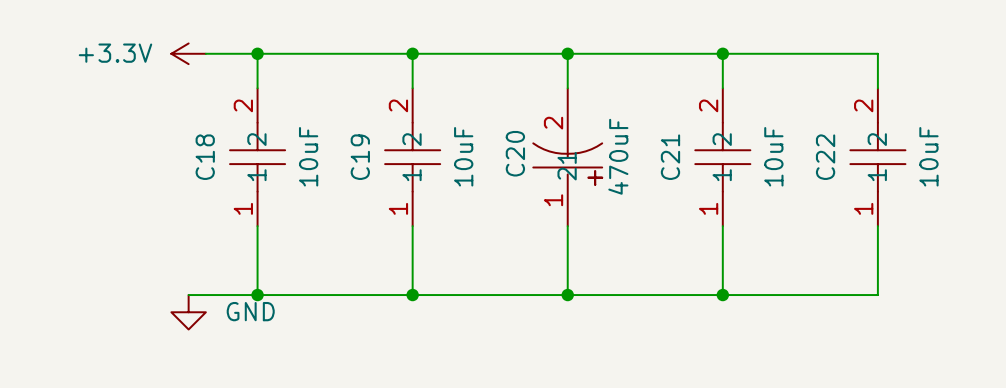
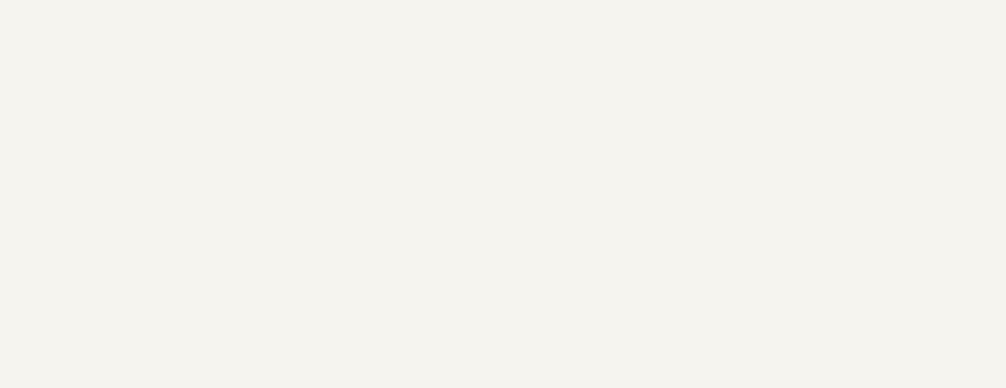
power symbol: +3.3V (188, 53) -> none
wire: (205, 53) (877, 53) (877, 88) -> none
wire: (257, 53) (257, 88) -> none
junction: (257, 53) -> none
wire: (412, 53) (412, 88) -> none
junction: (412, 53) -> none
wire: (567, 53) (567, 88) -> none
junction: (567, 53) -> none
wire: (722, 53) (722, 88) -> none
junction: (722, 53) -> none
C18: 10uF (257, 157) -> none
C19: 10uF (412, 157) -> none
C20: 470uF (567, 157) -> none
C21: 10uF (722, 157) -> none
C22: 10uF (877, 157) -> none
wire: (257, 226) (257, 295) -> none
wire: (412, 226) (412, 295) -> none
wire: (567, 226) (567, 295) -> none
wire: (722, 226) (722, 295) -> none
wire: (877, 226) (877, 295) (188, 295) -> none
junction: (257, 295) -> none
junction: (412, 295) -> none
junction: (567, 295) -> none
junction: (722, 295) -> none
power symbol: GND (188, 312) -> none

